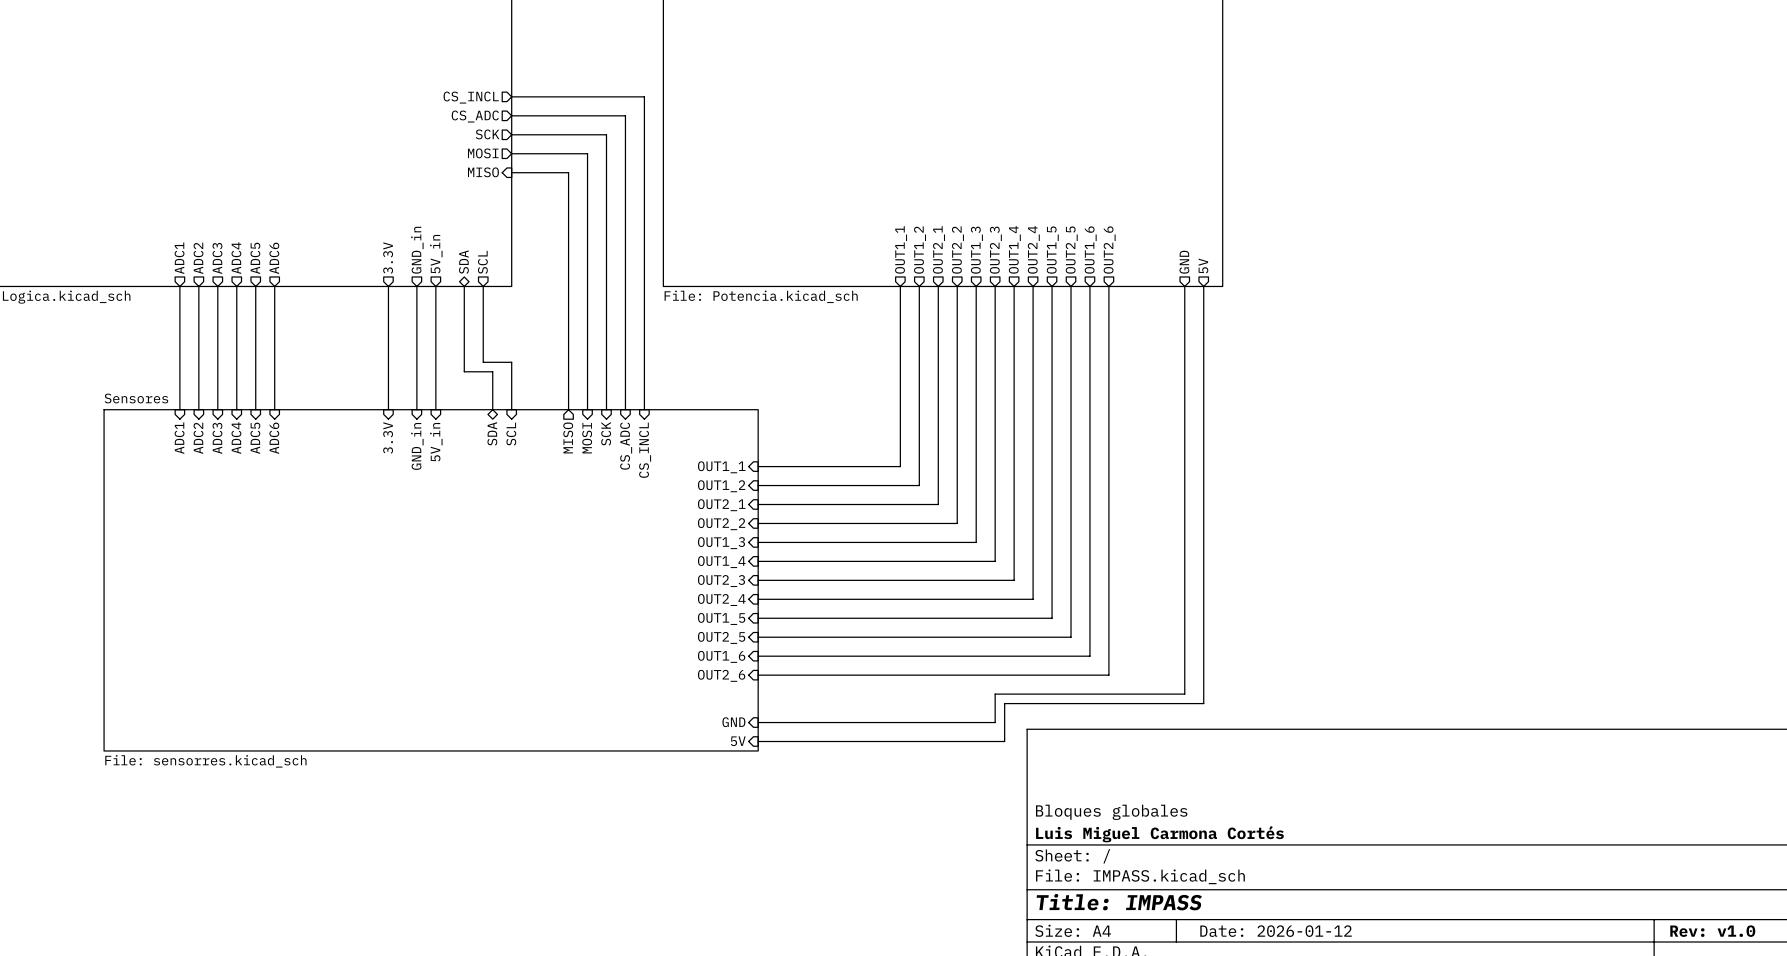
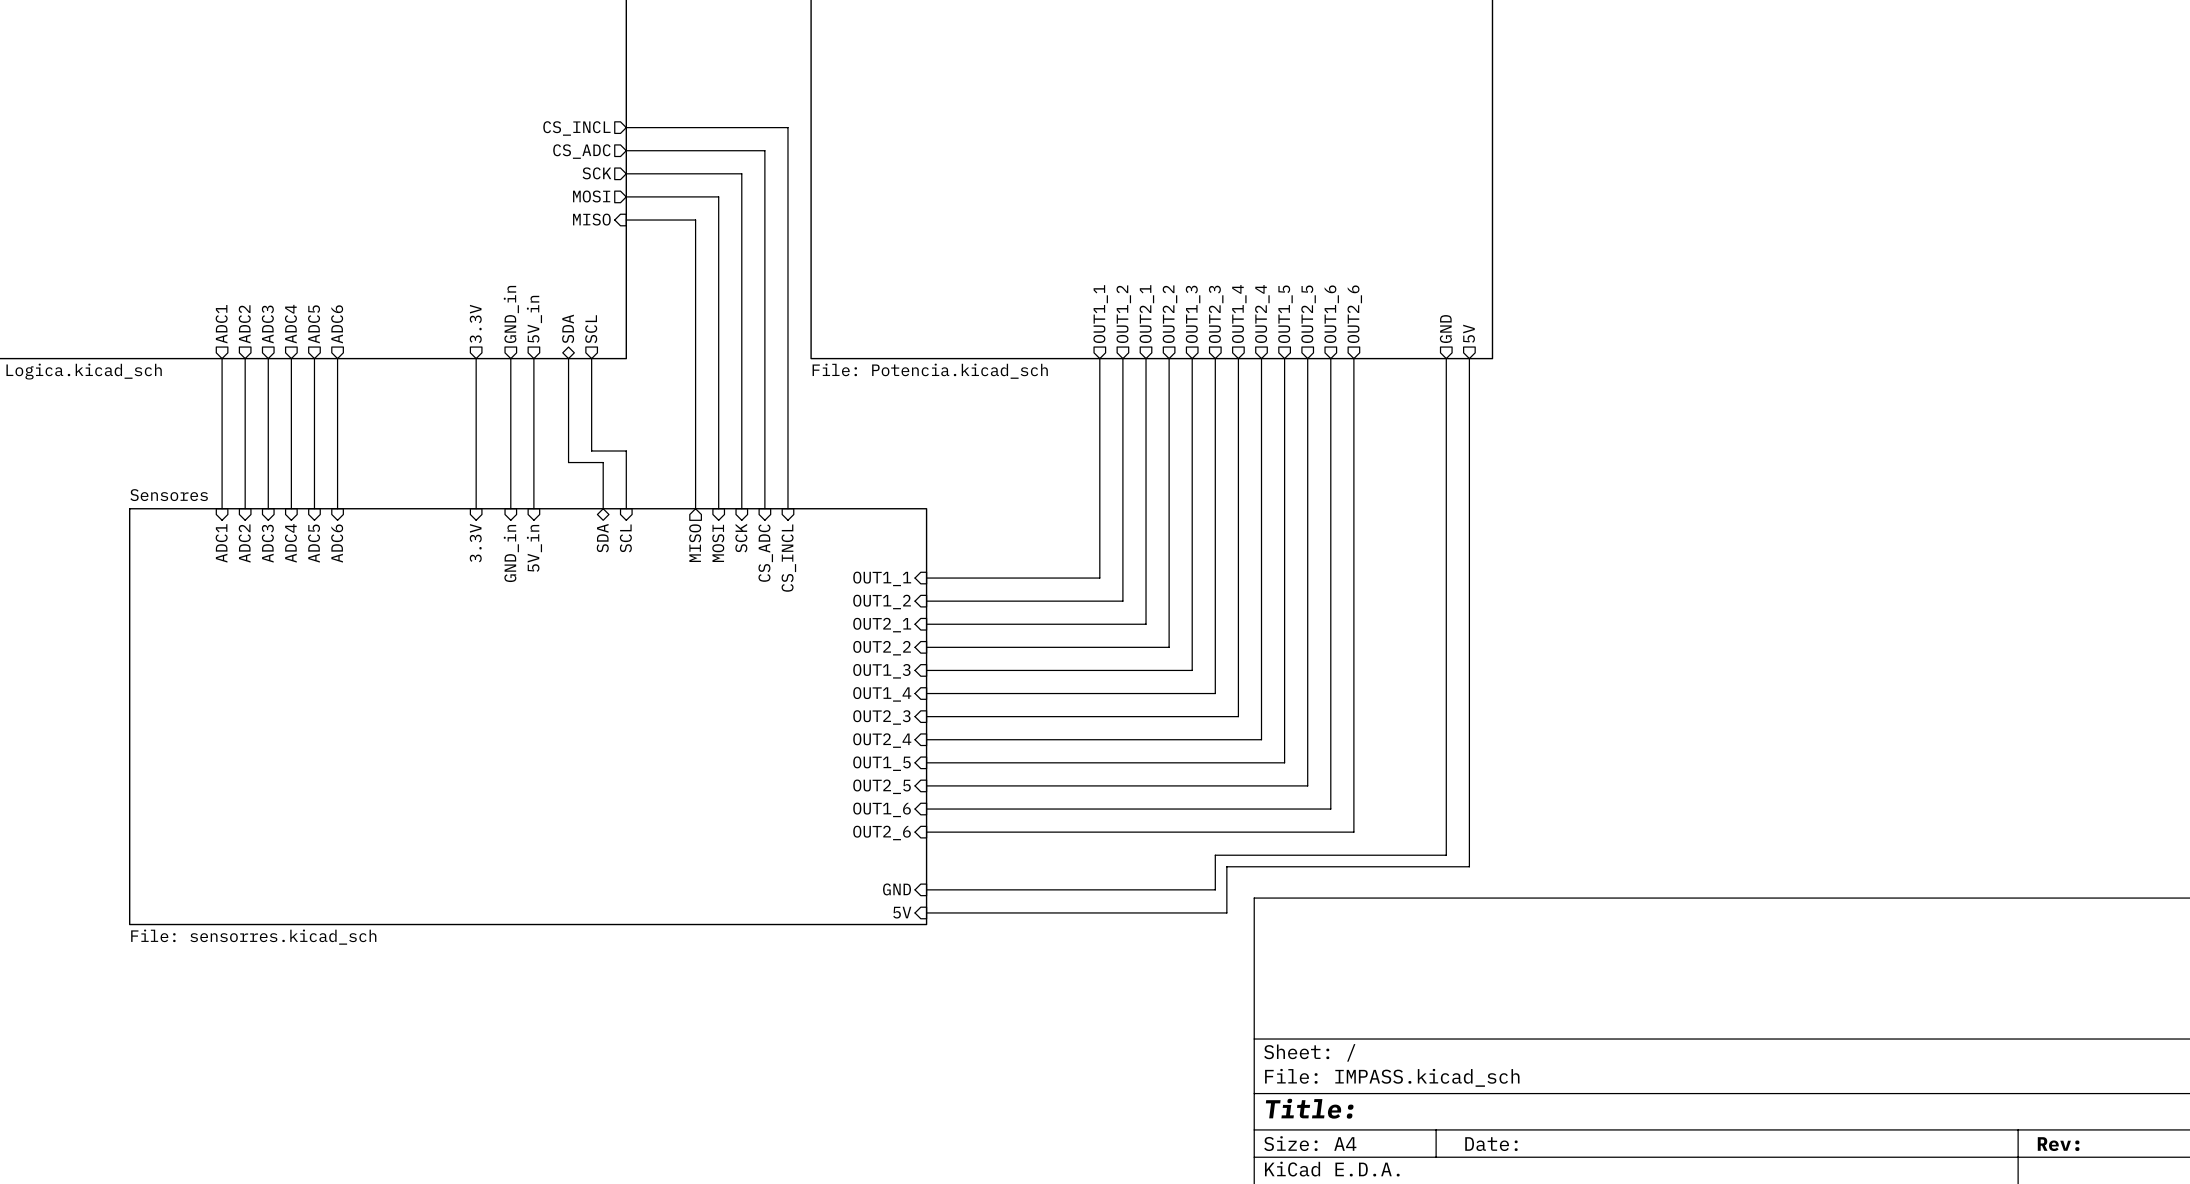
title block: Bloques globales (1111, 812) -> none
title block: Luis Miguel Carmona Cortés (1159, 834) -> none
title block: Title: IMPASS (1119, 902) -> Title: (1309, 1108)
title block: Date: 2026-01-12 (1276, 931) -> Date: (1491, 1144)
title block: Rev: v1.0 (1712, 931) -> Rev: (2058, 1144)

